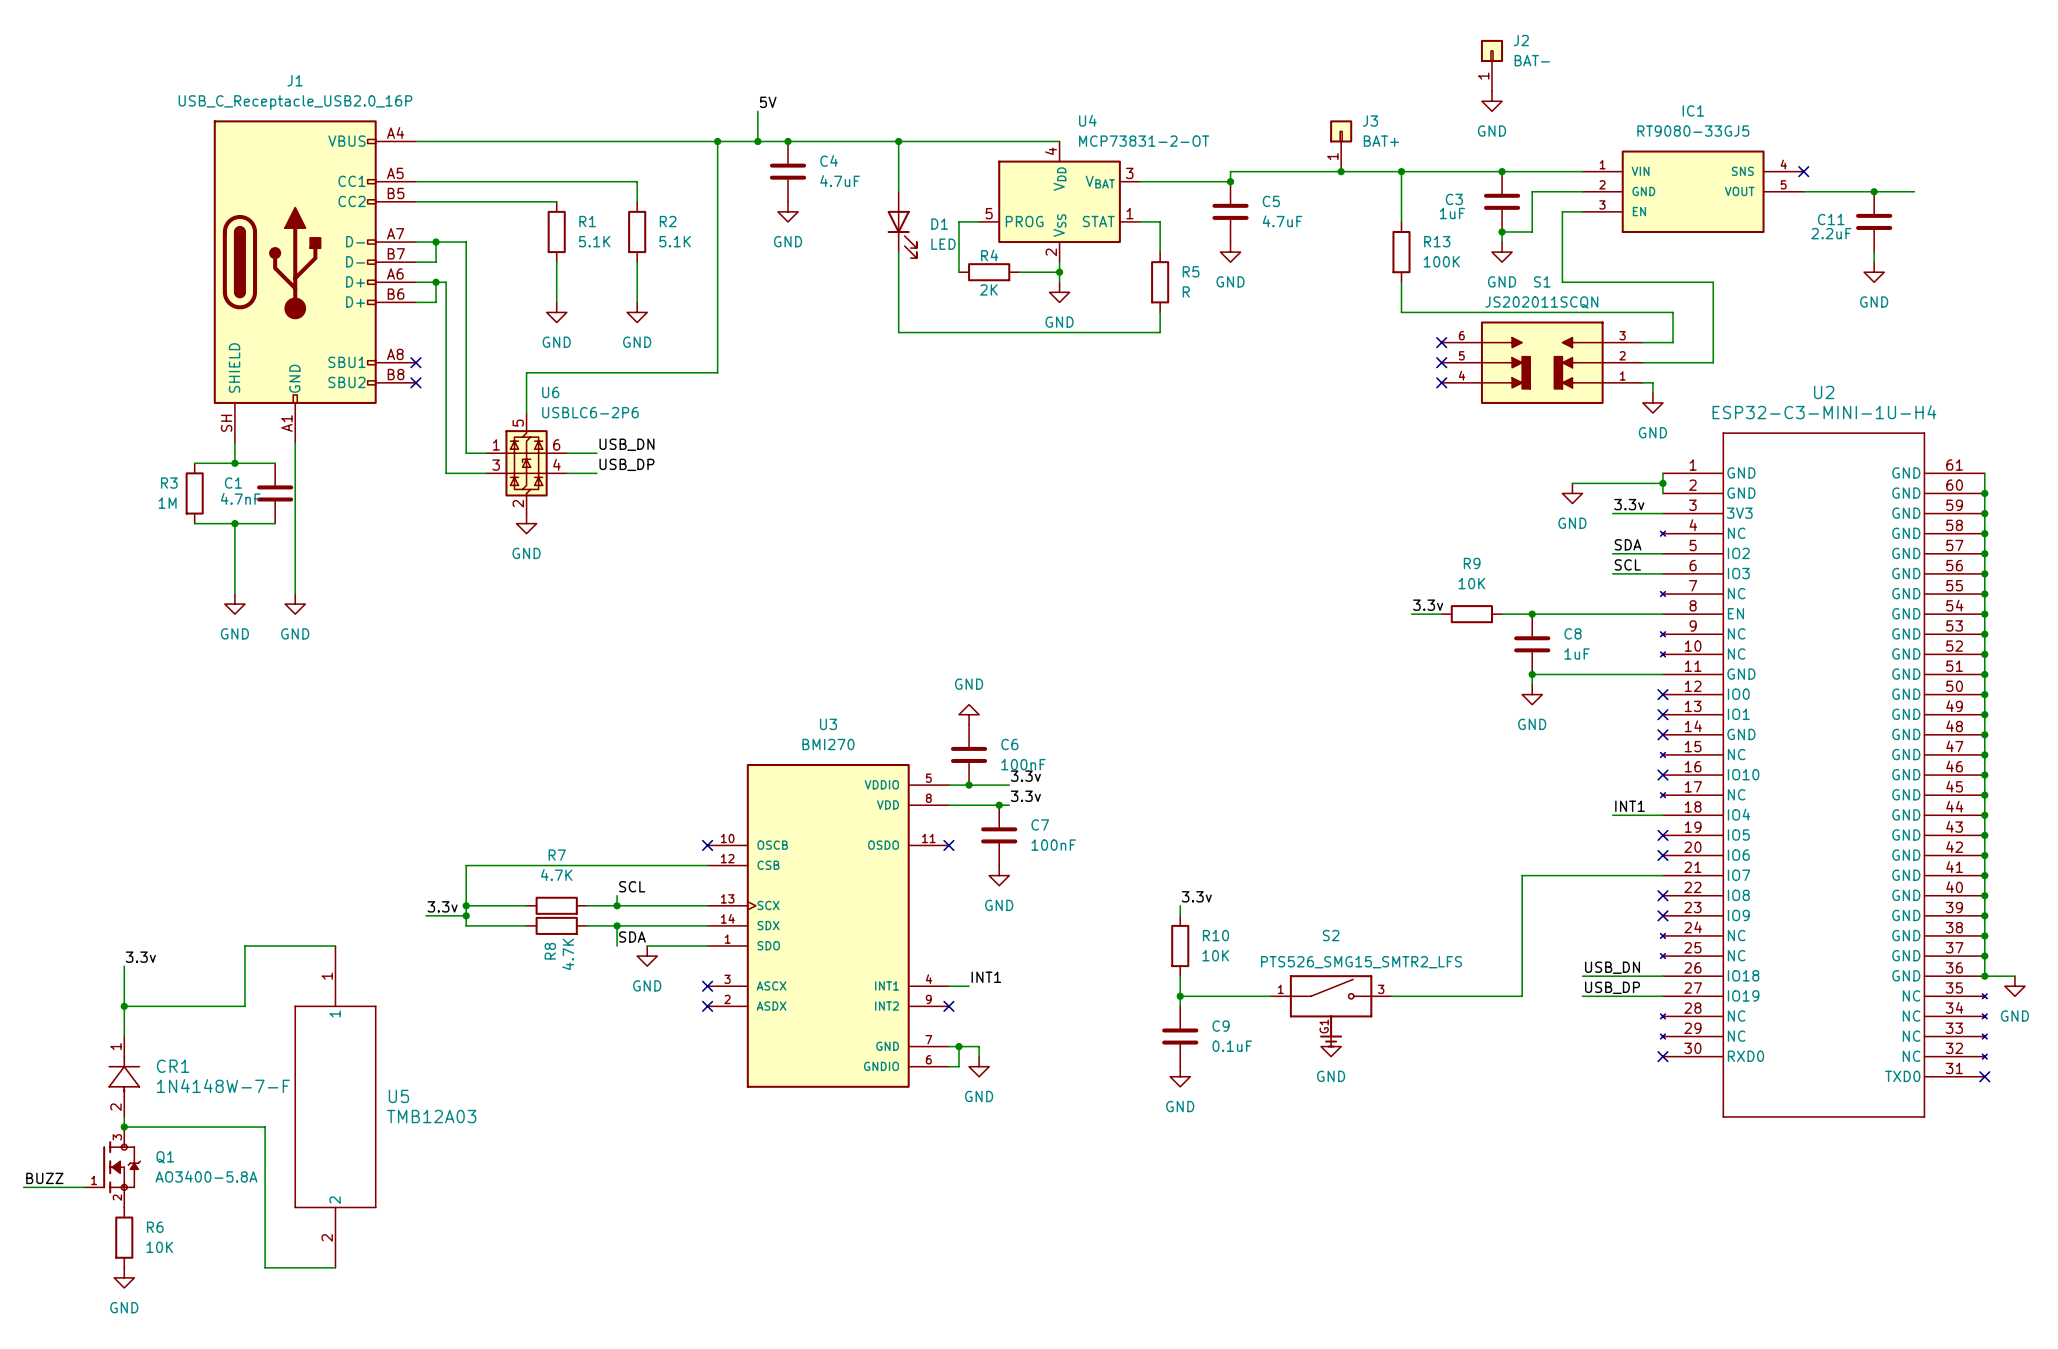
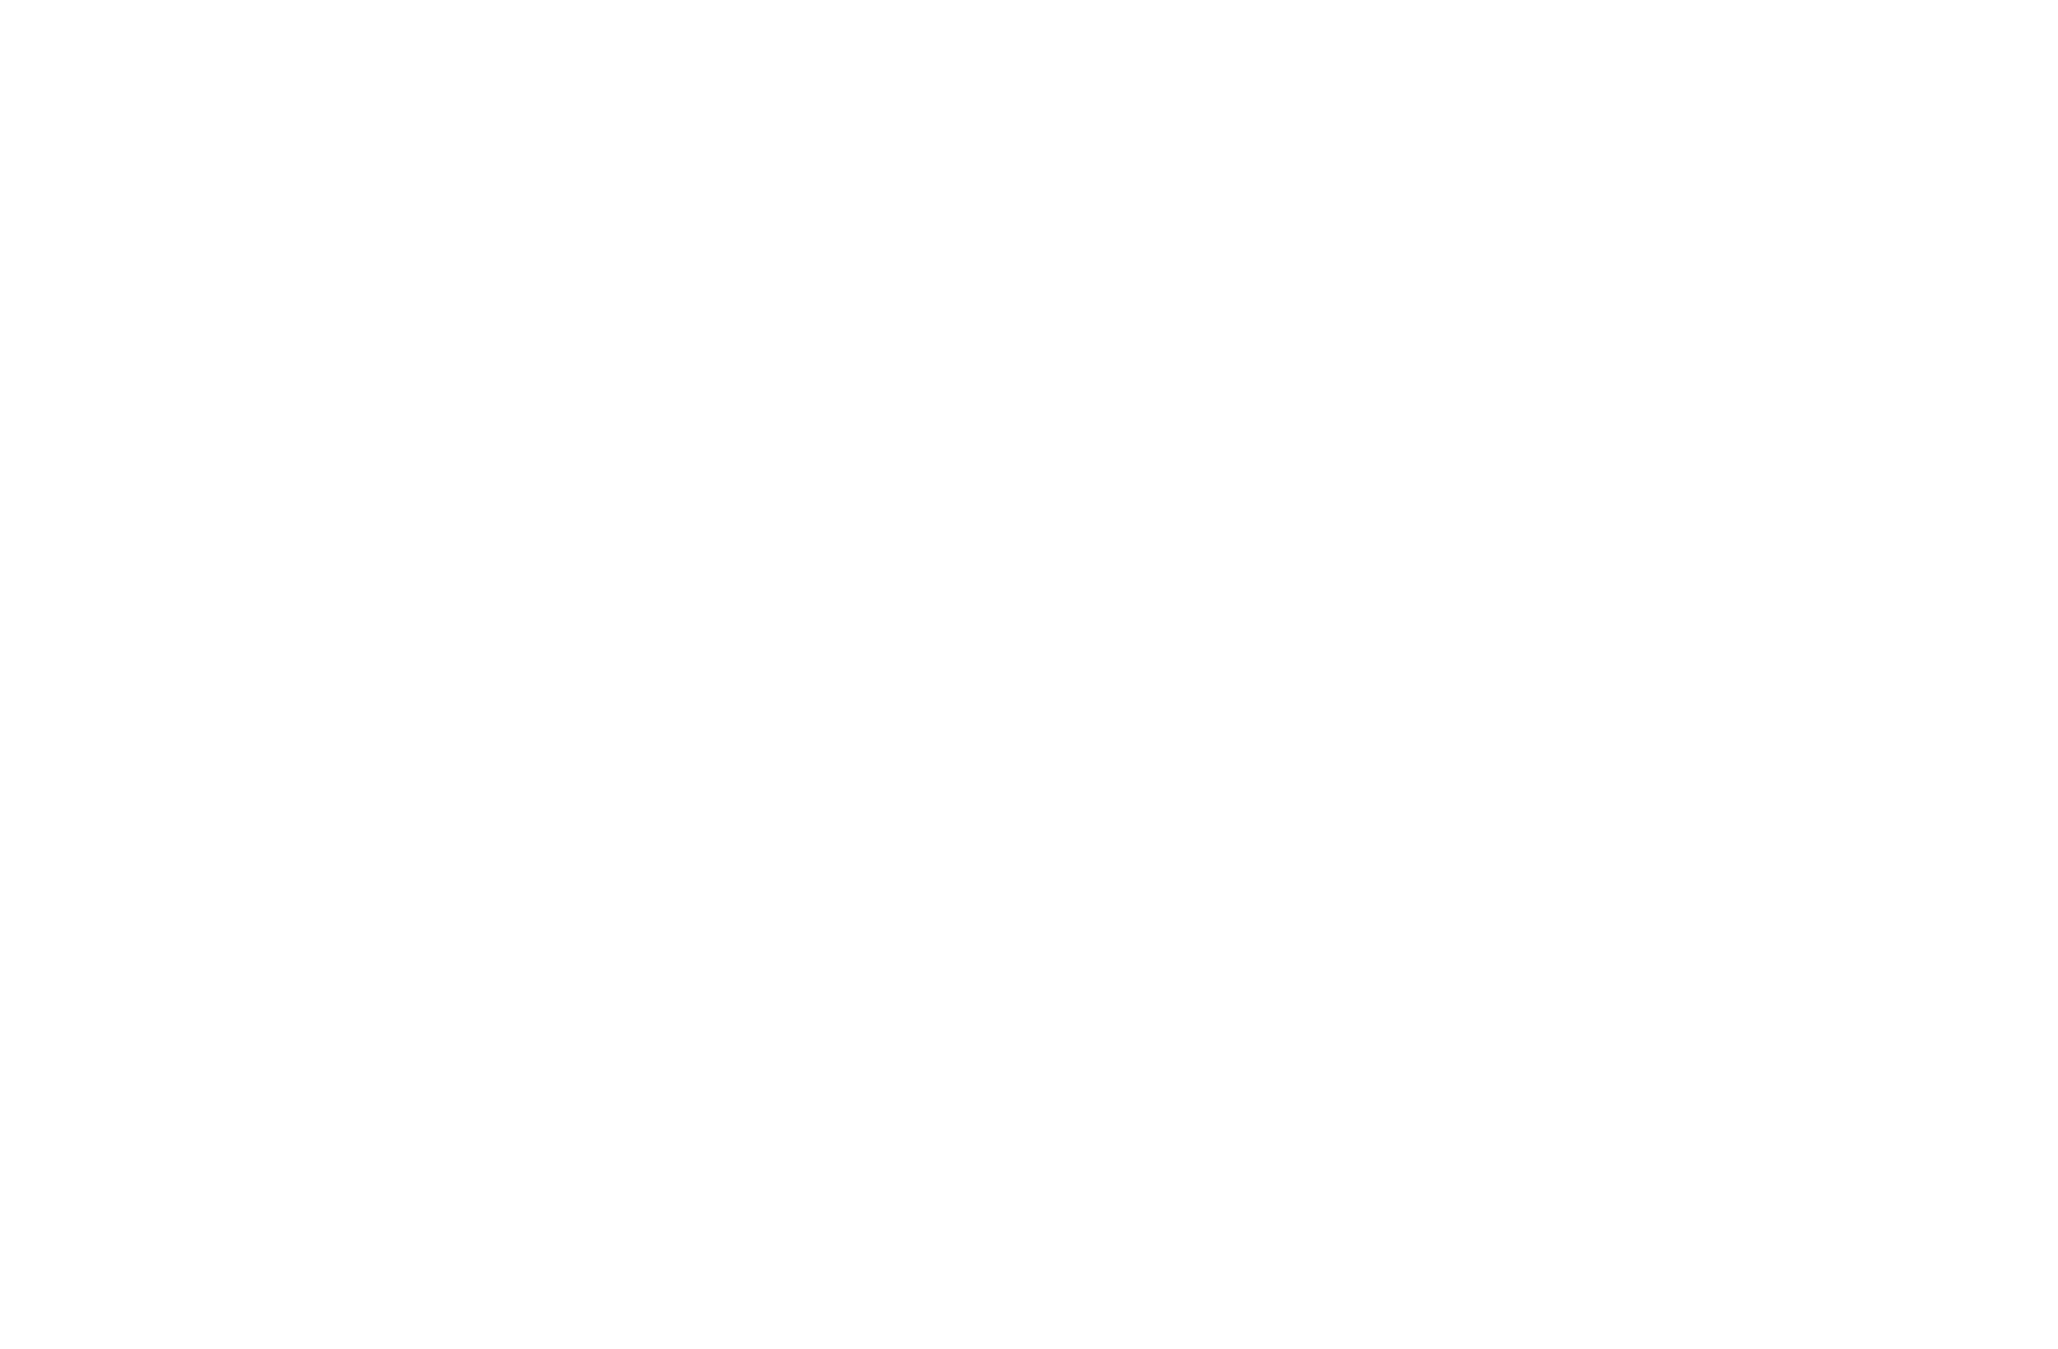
J2: BAT- (1492, 65) -> none
power symbol: GND (1492, 101) -> none
label: 5V (768, 102) -> none
wire: (757, 111) (757, 141) -> none
wire: (415, 141) (1059, 141) -> none
wire: (717, 141) (717, 372) (526, 372) (526, 413) -> none
junction: (717, 141) -> none
junction: (757, 141) -> none
junction: (788, 141) -> none
wire: (898, 141) (898, 191) -> none
junction: (898, 141) -> none
J3: BAT+ (1341, 146) -> none
C4: 4.7uF (788, 171) -> none
junction: (1341, 171) -> none
wire: (1401, 171) (1401, 221) -> none
junction: (1401, 171) -> none
junction: (1502, 171) -> none
wire: (1582, 171) (1230, 171) (1230, 181) (1140, 181) -> none
no-connect mark: (1803, 171) -> none
wire: (415, 181) (637, 181) (637, 201) -> none
junction: (1230, 181) -> none
wire: (1582, 191) (1532, 191) (1532, 231) (1502, 231) (1502, 242) -> none
IC1: RT9080-33GJ5 (1693, 191) -> none
wire: (1803, 191) (1914, 191) -> none
junction: (1874, 191) -> none
wire: (415, 201) (556, 201) -> none
U4: MCP73831-2-OT (1059, 201) -> none
C3: 1uF (1502, 201) -> none
power symbol: GND (788, 211) -> none
C5: 4.7uF (1230, 211) -> none
wire: (1582, 211) (1562, 211) (1562, 282) (1713, 282) (1713, 362) (1642, 362) -> none
wire: (979, 221) (958, 221) (958, 272) -> none
wire: (1140, 221) (1160, 221) (1160, 252) -> none
C11: 2.2uF (1874, 221) -> none
D1: LED (902, 224) -> none
R1: 5.1K (556, 231) -> none
R2: 5.1K (637, 231) -> none
junction: (1502, 231) -> none
wire: (415, 242) (466, 242) (466, 453) (486, 453) -> none
wire: (436, 242) (436, 262) (415, 262) -> none
junction: (436, 242) -> none
wire: (898, 252) (898, 332) (1160, 332) (1160, 312) -> none
power symbol: GND (1230, 252) -> none
R13: 100K (1401, 252) -> none
power symbol: GND (1502, 252) -> none
wire: (1874, 252) (1874, 262) -> none
wire: (556, 262) (556, 302) -> none
wire: (637, 262) (637, 302) -> none
wire: (1059, 262) (1059, 282) -> none
R4: 2K (989, 272) -> none
wire: (1019, 272) (1059, 272) -> none
junction: (1059, 272) -> none
power symbol: GND (1874, 272) -> none
J1: USB_C_Receptacle_USB2.0_16P (314, 281) -> none
wire: (415, 282) (446, 282) (446, 473) (486, 473) -> none
wire: (436, 282) (436, 302) (415, 302) -> none
junction: (436, 282) -> none
R5: R (1160, 282) -> none
wire: (1401, 282) (1401, 312) (1673, 312) (1673, 342) (1642, 342) -> none
power symbol: GND (1059, 292) -> none
power symbol: GND (556, 312) -> none
power symbol: GND (637, 312) -> none
no-connect mark: (1441, 342) -> none
no-connect mark: (415, 362) -> none
no-connect mark: (1441, 362) -> none
S1: JS202011SCQN (1542, 362) -> none
no-connect mark: (415, 382) -> none
no-connect mark: (1441, 382) -> none
wire: (1642, 382) (1652, 382) (1652, 392) -> none
power symbol: GND (1652, 402) -> none
wire: (234, 443) (234, 463) -> none
wire: (295, 443) (295, 594) -> none
label: USB_DN (626, 444) -> none
wire: (566, 453) (596, 453) -> none
wire: (194, 463) (275, 463) -> none
junction: (234, 463) -> none
U6: USBLC6-2P6 (526, 463) -> none
label: USB_DP (626, 464) -> none
wire: (566, 473) (596, 473) -> none
wire: (1662, 473) (1662, 493) -> none
wire: (1984, 473) (1984, 976) (2014, 976) -> none
wire: (1572, 483) (1662, 483) -> none
junction: (1662, 483) -> none
R3: 1M (194, 493) -> none
C1: 4.7nF (275, 493) -> none
power symbol: GND (1572, 493) -> none
junction: (1984, 493) -> none
label: 3.3v (1629, 504) -> none
wire: (1612, 513) (1662, 513) -> none
junction: (1984, 513) -> none
wire: (194, 523) (275, 523) -> none
wire: (234, 523) (234, 594) -> none
junction: (234, 523) -> none
power symbol: GND (526, 523) -> none
junction: (1984, 533) -> none
label: SDA (1628, 544) -> none
wire: (1612, 553) (1662, 553) -> none
junction: (1984, 553) -> none
label: SCL (1627, 564) -> none
wire: (1612, 573) (1662, 573) -> none
junction: (1984, 573) -> none
junction: (1984, 594) -> none
power symbol: GND (234, 604) -> none
power symbol: GND (295, 604) -> none
label: 3.3v (1428, 605) -> none
wire: (1411, 614) (1441, 614) -> none
R9: 10K (1471, 614) -> none
wire: (1502, 614) (1662, 614) -> none
junction: (1532, 614) -> none
junction: (1984, 614) -> none
junction: (1984, 634) -> none
C8: 1uF (1532, 644) -> none
junction: (1984, 654) -> none
junction: (1532, 674) -> none
wire: (1662, 674) (1532, 674) (1532, 684) -> none
junction: (1984, 674) -> none
power symbol: GND (1532, 694) -> none
no-connect mark: (1662, 694) -> none
junction: (1984, 694) -> none
power symbol: GND (969, 714) -> none
no-connect mark: (1662, 714) -> none
junction: (1984, 714) -> none
no-connect mark: (1662, 734) -> none
junction: (1984, 734) -> none
C6: 100nF (969, 754) -> none
junction: (1984, 754) -> none
no-connect mark: (1662, 775) -> none
U2: ESP32-C3-MINI-1U-H4 (1823, 775) -> none
junction: (1984, 775) -> none
label: 3.3v (1025, 776) -> none
wire: (948, 785) (1009, 785) -> none
junction: (969, 785) -> none
junction: (1984, 795) -> none
label: 3.3v (1025, 796) -> none
wire: (948, 805) (1009, 805) -> none
junction: (999, 805) -> none
label: INT1 (1629, 806) -> none
wire: (1612, 815) (1662, 815) -> none
junction: (1984, 815) -> none
C7: 100nF (999, 835) -> none
no-connect mark: (1662, 835) -> none
junction: (1984, 835) -> none
no-connect mark: (707, 845) -> none
no-connect mark: (948, 845) -> none
no-connect mark: (1662, 855) -> none
junction: (1984, 855) -> none
wire: (707, 865) (466, 865) (466, 925) (526, 925) -> none
power symbol: GND (999, 875) -> none
wire: (1662, 875) (1522, 875) (1522, 996) (1391, 996) -> none
junction: (1984, 875) -> none
label: SCL (632, 886) -> none
wire: (617, 895) (617, 905) -> none
no-connect mark: (1662, 895) -> none
junction: (1984, 895) -> none
label: 3.3v (1196, 896) -> none
wire: (466, 905) (526, 905) -> none
junction: (466, 905) -> none
R7: 4.7K (556, 905) -> none
wire: (586, 905) (707, 905) -> none
junction: (617, 905) -> none
wire: (1180, 905) (1180, 915) -> none
label: 3.3v (442, 906) -> none
wire: (425, 915) (466, 915) -> none
junction: (466, 915) -> none
no-connect mark: (1662, 915) -> none
junction: (1984, 915) -> none
R8: 4.7K (556, 925) -> none
wire: (586, 925) (707, 925) -> none
wire: (617, 925) (617, 946) -> none
junction: (617, 925) -> none
U3: BMI270 (828, 925) -> none
junction: (1984, 935) -> none
label: SDA (632, 937) -> none
wire: (335, 946) (244, 946) (244, 1006) (124, 1006) -> none
wire: (647, 946) (707, 946) -> none
R10: 10K (1180, 946) -> none
power symbol: GND (647, 956) -> none
junction: (1984, 956) -> none
label: 3.3v (140, 957) -> none
wire: (124, 966) (124, 1036) -> none
label: USB_DN (1612, 967) -> none
wire: (1180, 976) (1180, 1006) -> none
wire: (1582, 976) (1662, 976) -> none
junction: (1984, 976) -> none
label: INT1 (986, 977) -> none
no-connect mark: (707, 986) -> none
wire: (948, 986) (969, 986) -> none
power symbol: GND (2014, 986) -> none
label: USB_DP (1612, 987) -> none
wire: (1180, 996) (1270, 996) -> none
junction: (1180, 996) -> none
wire: (1582, 996) (1662, 996) -> none
junction: (124, 1006) -> none
no-connect mark: (707, 1006) -> none
no-connect mark: (948, 1006) -> none
S2: PTS526_SMG15_SMTR2_LFS (1331, 1011) -> none
C9: 0.1uF (1180, 1036) -> none
wire: (948, 1046) (979, 1046) (979, 1056) -> none
wire: (958, 1046) (958, 1066) (948, 1066) -> none
junction: (958, 1046) -> none
power symbol: GND (1331, 1046) -> none
no-connect mark: (1662, 1056) -> none
power symbol: GND (979, 1066) -> none
CR1: 1N4148W-7-F (124, 1076) -> none
power symbol: GND (1180, 1076) -> none
no-connect mark: (1984, 1076) -> none
U5: TMB12A03 (335, 1106) -> none
wire: (124, 1116) (124, 1127) (265, 1127) (265, 1267) (335, 1267) -> none
junction: (124, 1127) -> none
Q1: AO3400-5.8A (112, 1167) -> none
label: BUZZ (44, 1178) -> none
wire: (23, 1187) (84, 1187) -> none
R6: 10K (124, 1237) -> none
power symbol: GND (124, 1277) -> none

